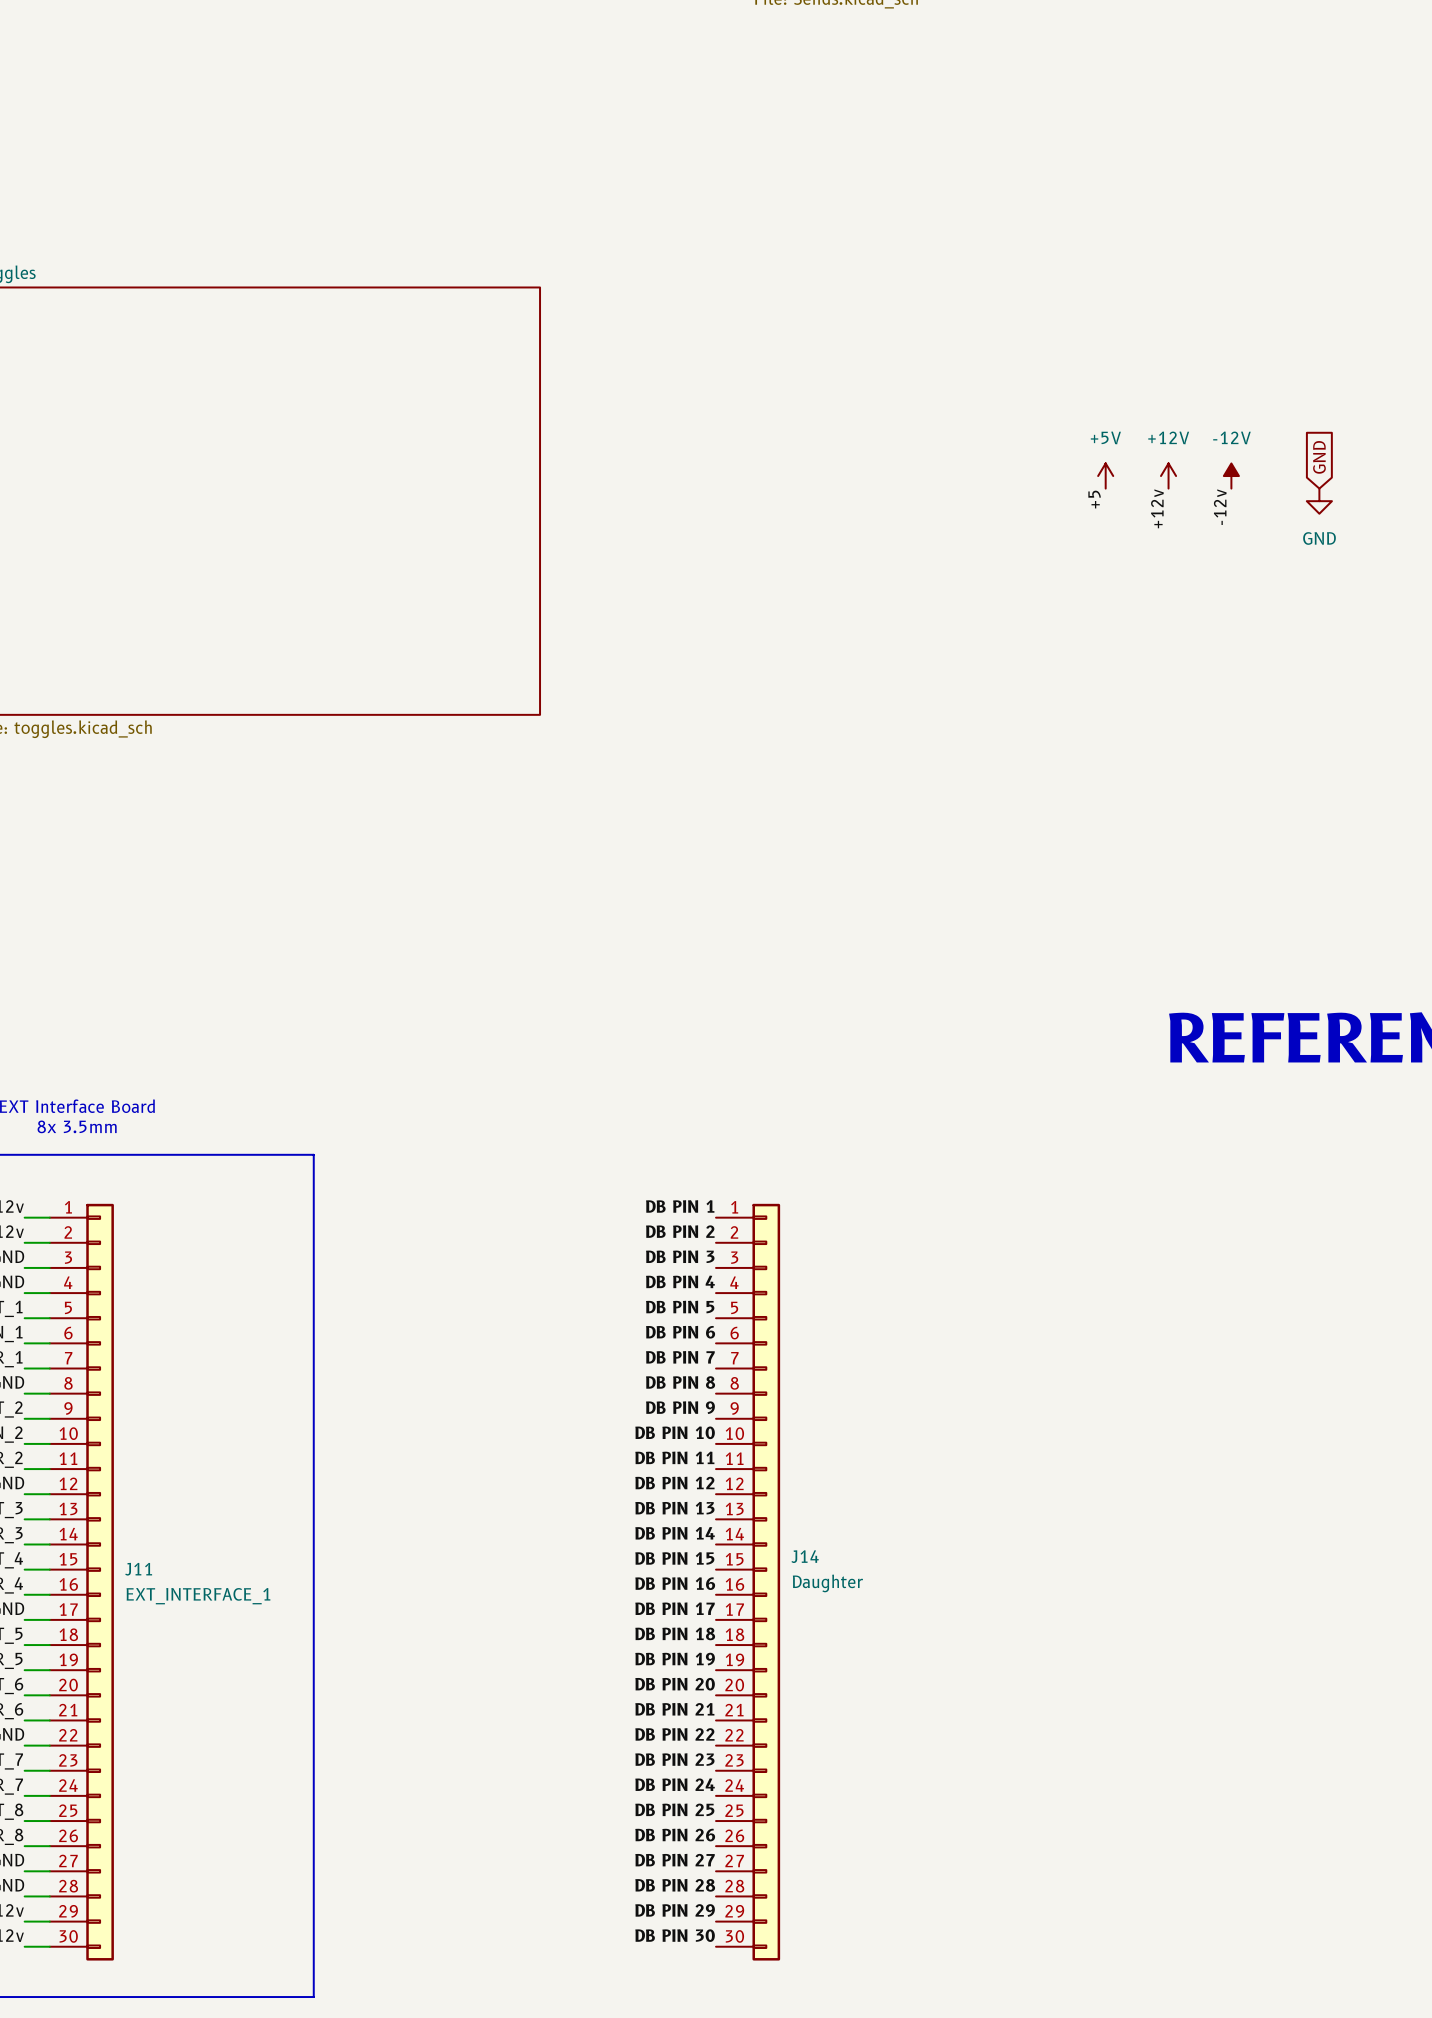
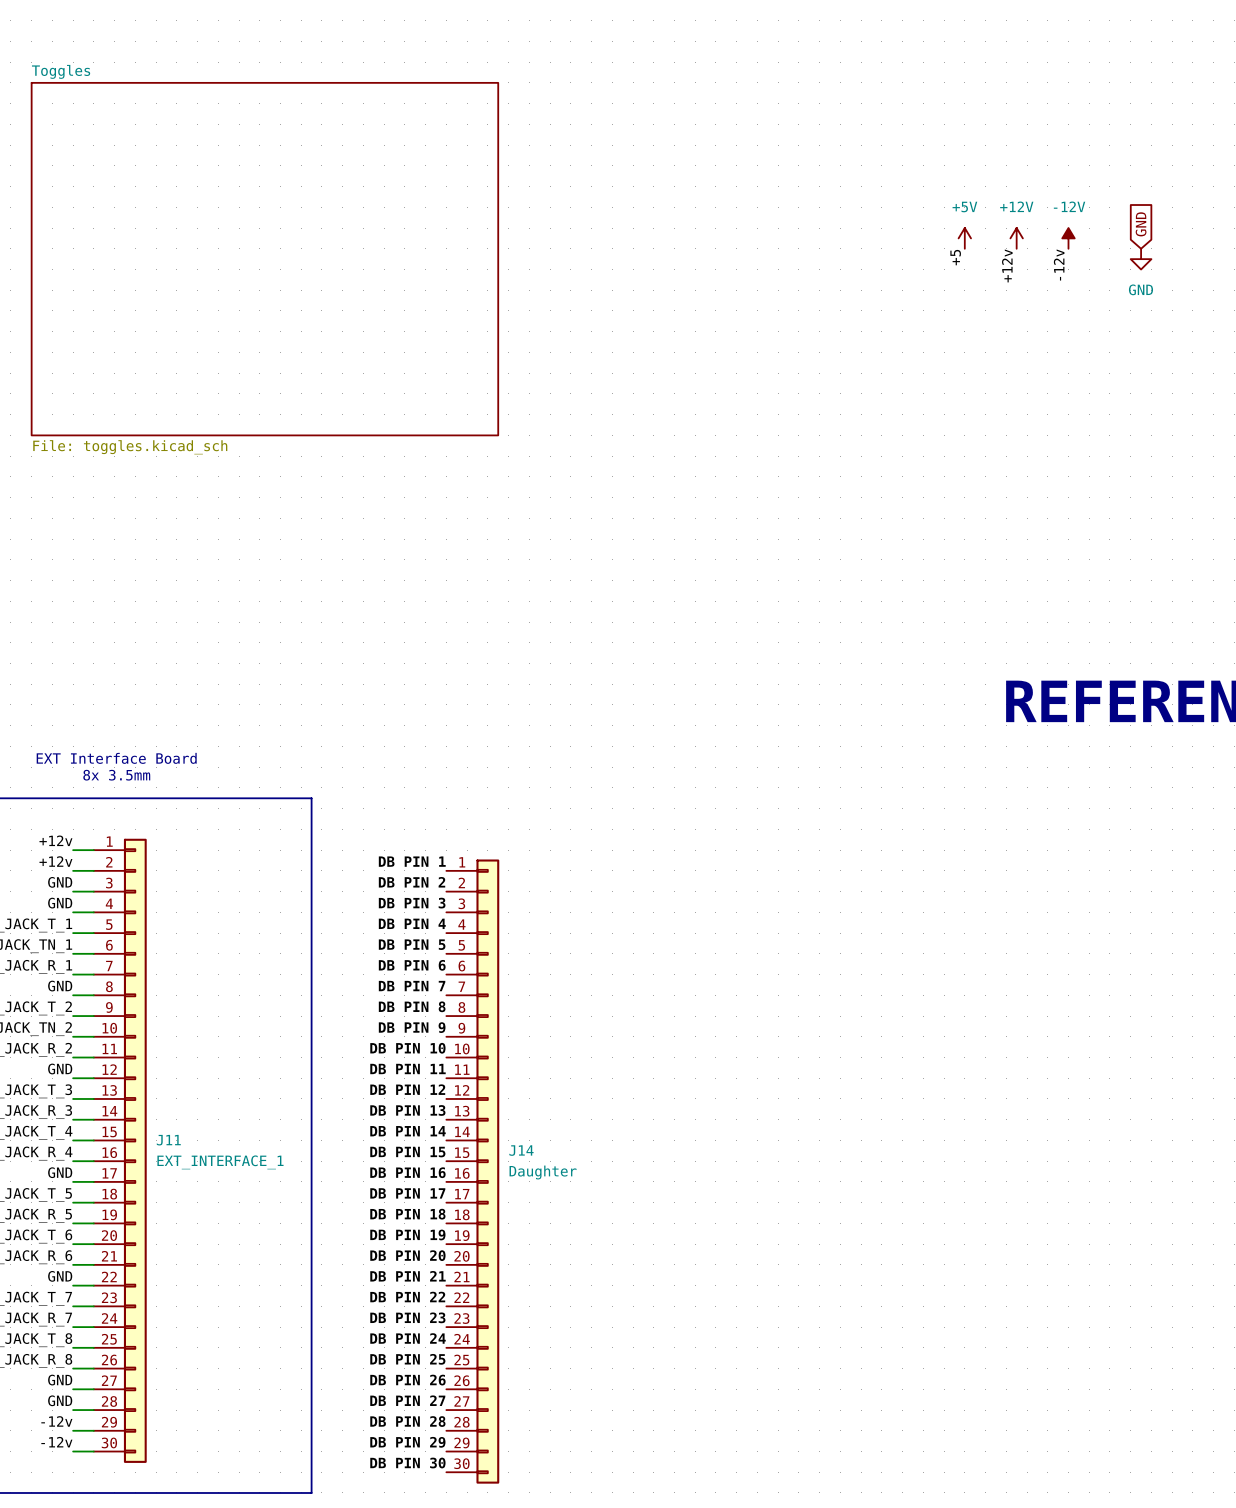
label position: DB PIN 1 (680, 1206) -> DB PIN 1 (412, 861)
label position: DB PIN 2 (680, 1231) -> DB PIN 2 (412, 882)
label position: DB PIN 3 (680, 1256) -> DB PIN 3 (412, 903)
label position: DB PIN 4 (680, 1281) -> DB PIN 4 (412, 923)
label position: DB PIN 5 (680, 1307) -> DB PIN 5 (412, 944)
label position: DB PIN 6 (680, 1332) -> DB PIN 6 (412, 965)
label position: DB PIN 7 (680, 1357) -> DB PIN 7 (412, 986)
label position: DB PIN 8 (680, 1382) -> DB PIN 8 (412, 1006)
label position: DB PIN 9 (680, 1407) -> DB PIN 9 (412, 1027)
label position: DB PIN 10 (675, 1432) -> DB PIN 10 (407, 1048)
label position: DB PIN 11 (674, 1457) -> DB PIN 11 (407, 1068)
label position: DB PIN 12 (674, 1482) -> DB PIN 12 (407, 1089)
label position: DB PIN 13 (674, 1508) -> DB PIN 13 (407, 1110)
label position: DB PIN 14 (675, 1533) -> DB PIN 14 (408, 1131)
label position: DB PIN 15 (674, 1558) -> DB PIN 15 (407, 1152)
J14 position: (748, 1582) -> (472, 1171)
label position: DB PIN 16 (675, 1583) -> DB PIN 16 (407, 1172)
label position: DB PIN 17 (675, 1608) -> DB PIN 17 (407, 1193)
label position: DB PIN 18 (675, 1633) -> DB PIN 18 (407, 1214)
label position: DB PIN 19 (675, 1659) -> DB PIN 19 (407, 1234)
label position: DB PIN 20 (675, 1684) -> DB PIN 20 (407, 1255)
label position: DB PIN 21 (674, 1709) -> DB PIN 21 (407, 1276)
label position: DB PIN 22 (674, 1734) -> DB PIN 22 (407, 1297)
label position: DB PIN 23 (674, 1759) -> DB PIN 23 (407, 1317)
label position: DB PIN 24 (675, 1784) -> DB PIN 24 (408, 1338)
label position: DB PIN 25 (674, 1809) -> DB PIN 25 (407, 1359)
label position: DB PIN 26 (675, 1835) -> DB PIN 26 (407, 1380)
label position: DB PIN 27 (675, 1860) -> DB PIN 27 (407, 1400)
label position: DB PIN 28 (675, 1885) -> DB PIN 28 (407, 1421)
label position: DB PIN 29 (675, 1910) -> DB PIN 29 (407, 1442)
label position: DB PIN 30 (675, 1935) -> DB PIN 30 (407, 1463)

